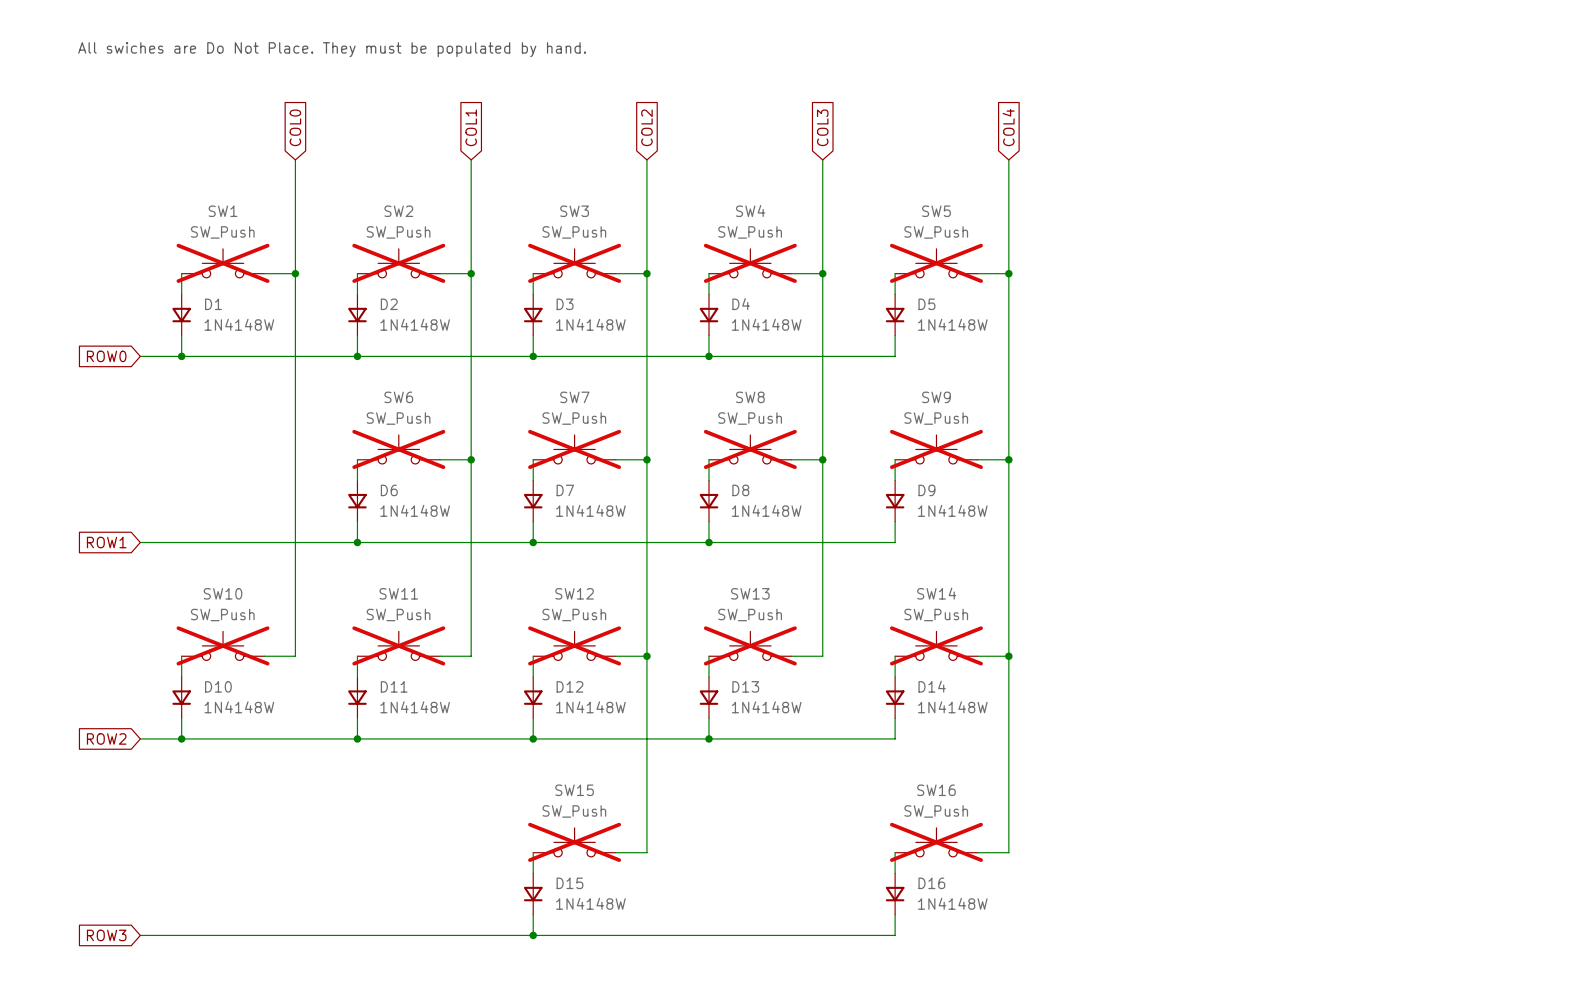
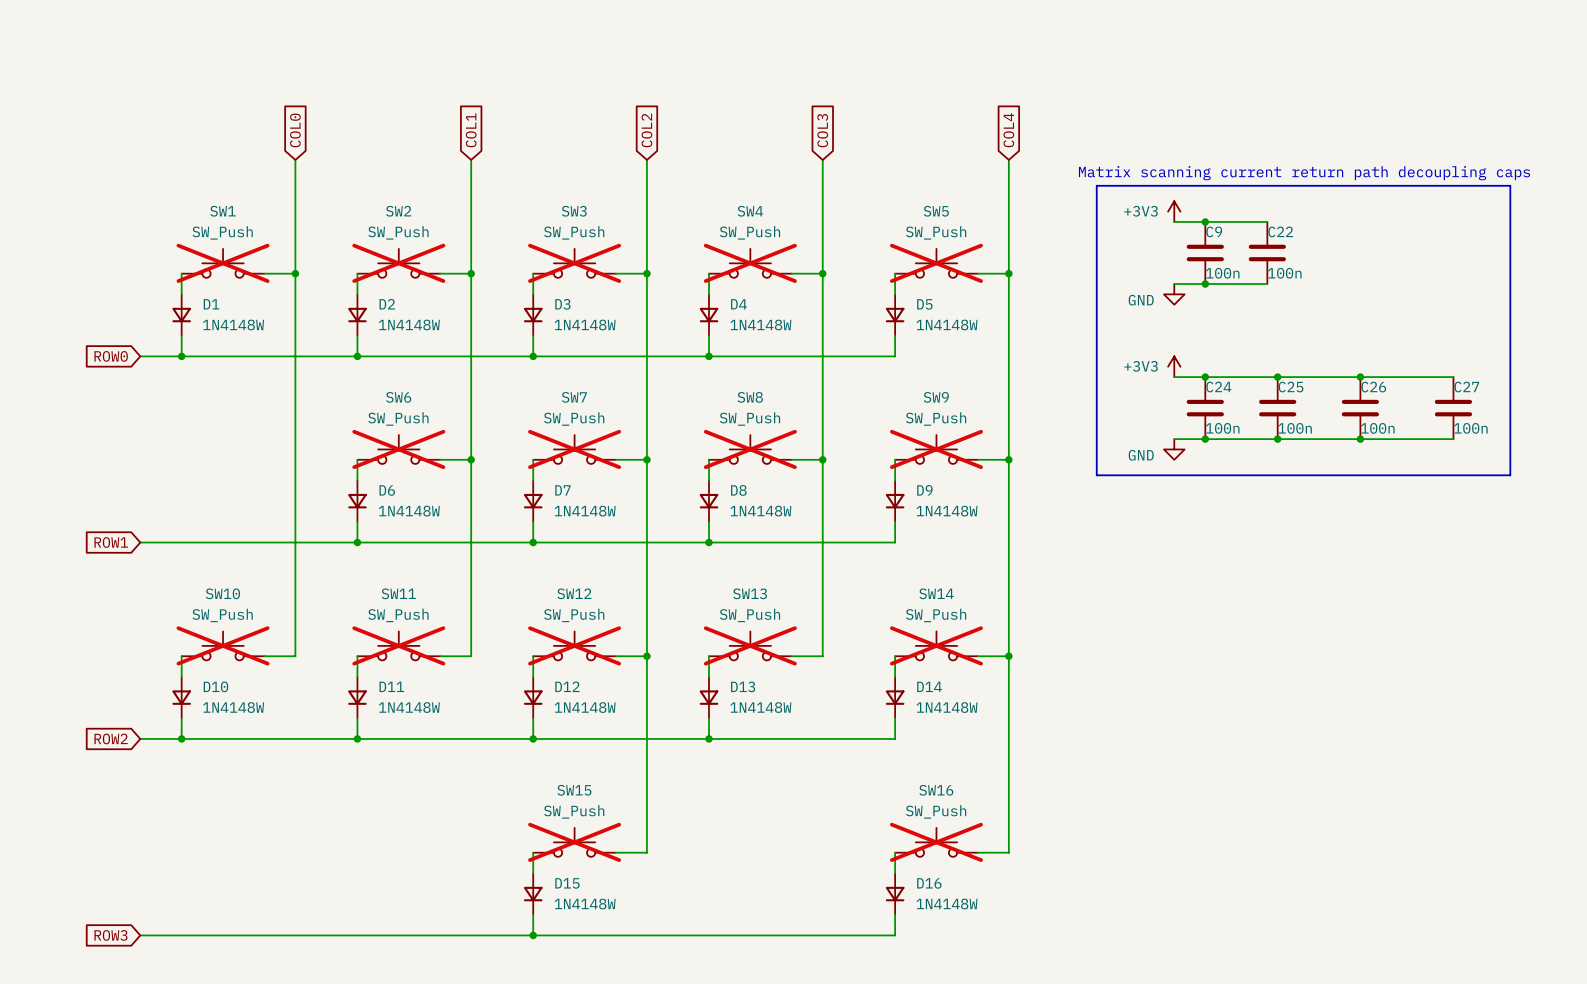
text: All swiches are Do Not Place. They must be populated by hand. (332, 49) -> none
text: none -> Matrix scanning current return path decoupling caps (1304, 173)
line: none -> (1096, 185) (1510, 185) (1510, 475) (1096, 475) (1096, 185)
power symbol: none -> +3V3 (1174, 211)
wire: none -> (1174, 221) (1267, 221)
junction: none -> (1205, 221)
C9: none -> 100n (1205, 253)
C22: none -> 100n (1267, 253)
wire: none -> (1174, 284) (1267, 284)
junction: none -> (1205, 284)
power symbol: none -> GND (1174, 294)
power symbol: none -> +3V3 (1174, 366)
wire: none -> (1174, 377) (1453, 377)
junction: none -> (1205, 377)
junction: none -> (1277, 377)
junction: none -> (1360, 377)
C24: none -> 100n (1205, 408)
C25: none -> 100n (1277, 408)
C26: none -> 100n (1360, 408)
C27: none -> 100n (1453, 408)
wire: none -> (1174, 439) (1453, 439)
junction: none -> (1205, 439)
junction: none -> (1277, 439)
junction: none -> (1360, 439)
power symbol: none -> GND (1174, 449)

